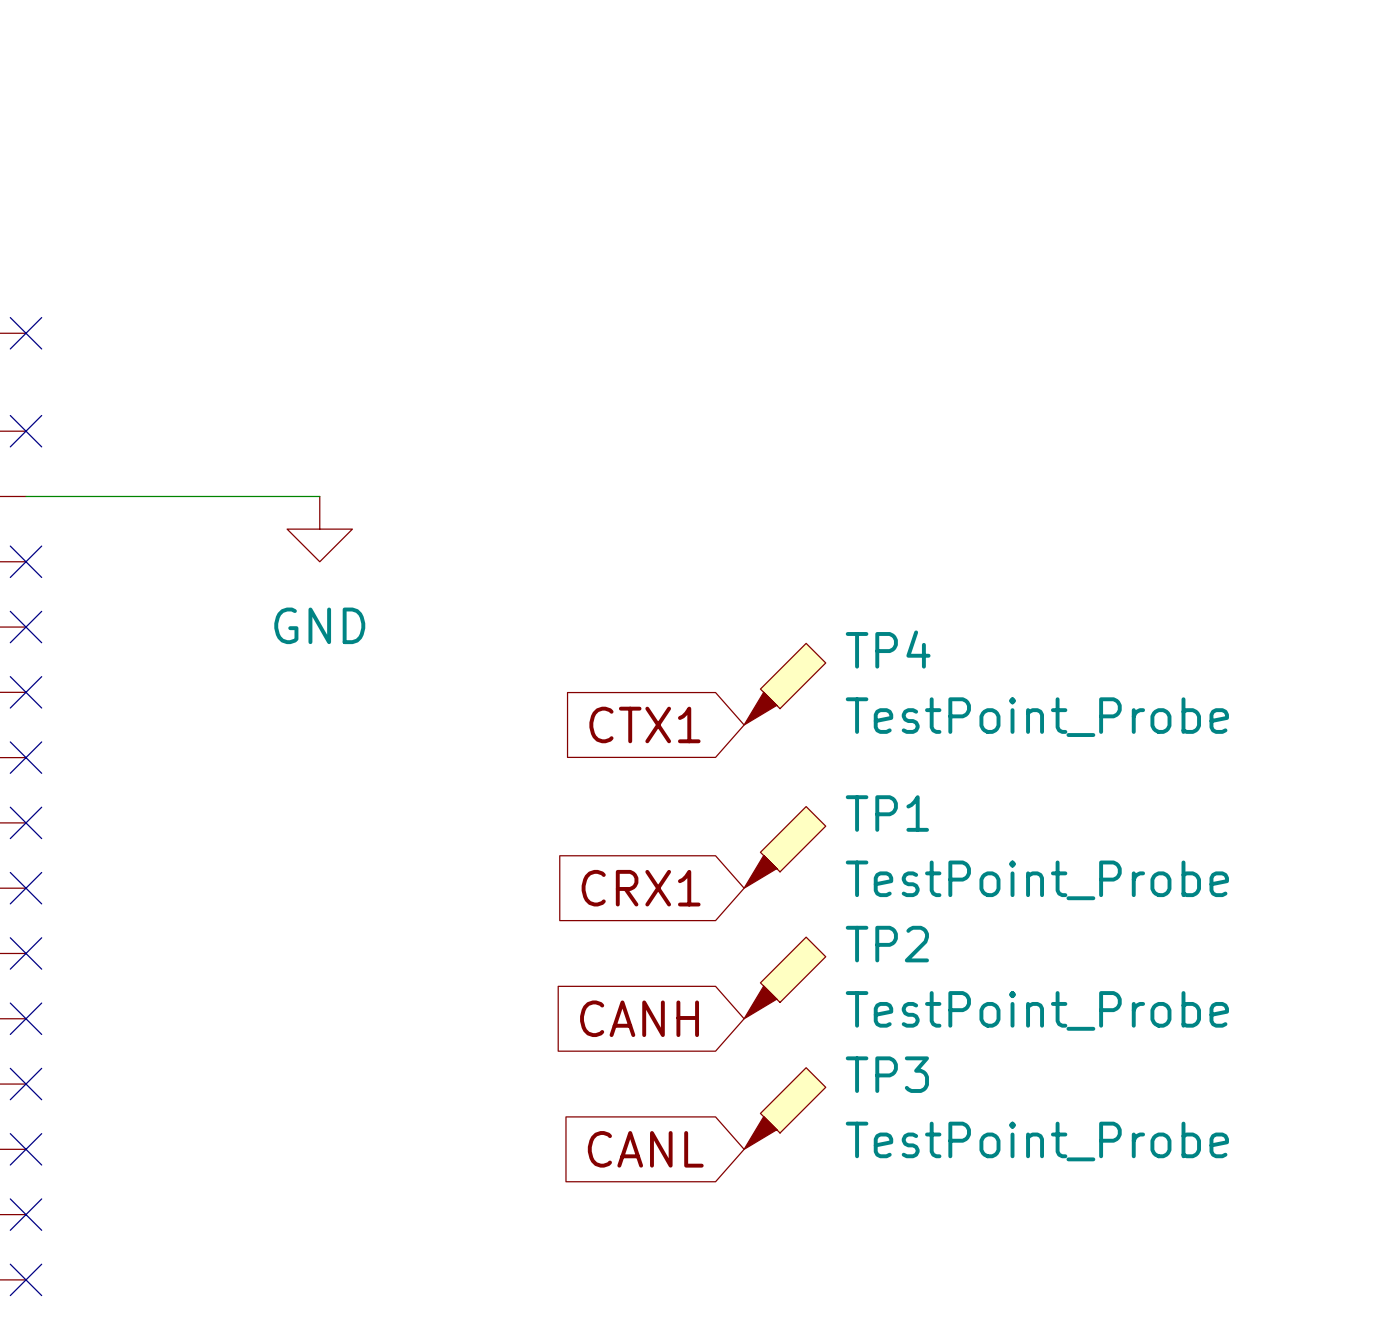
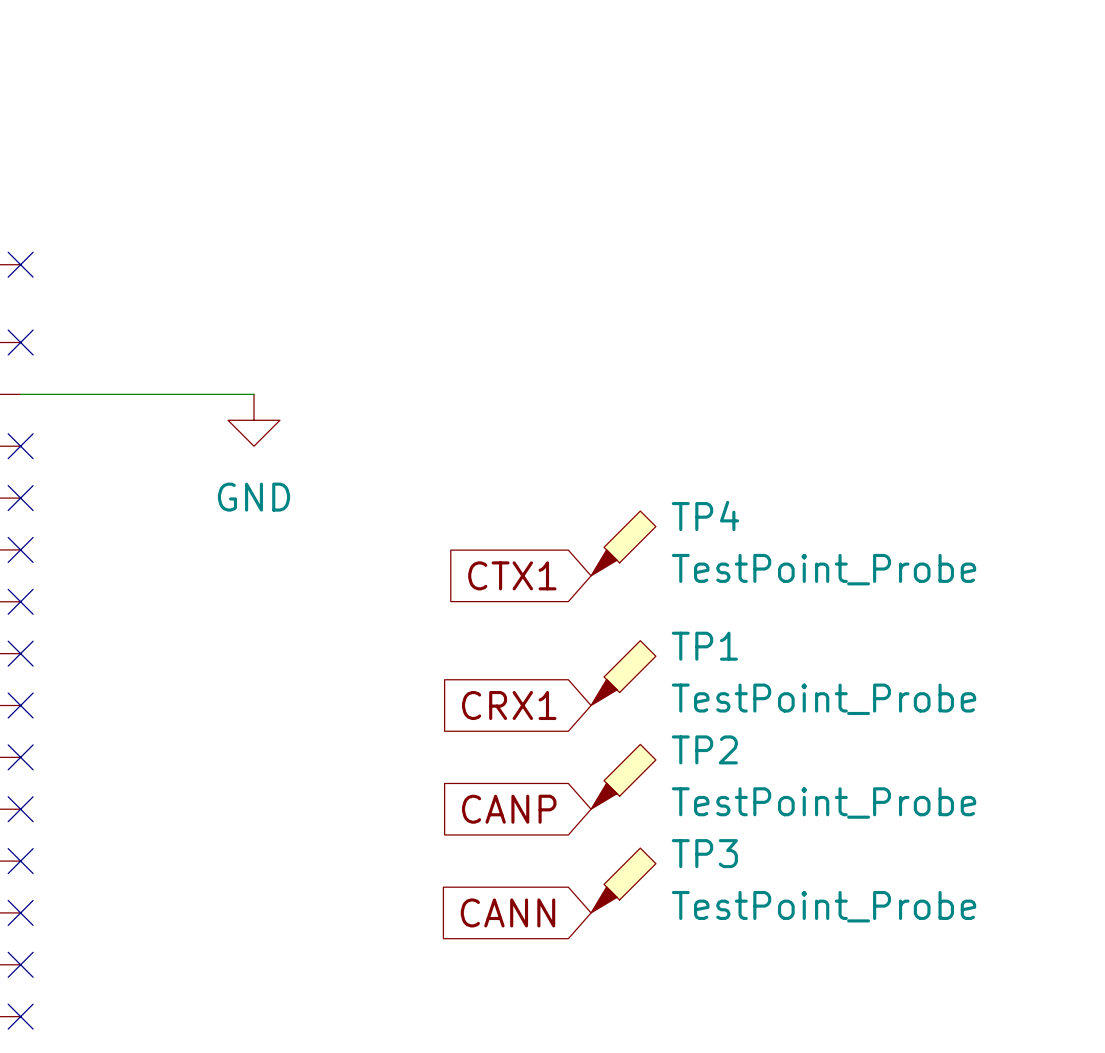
global label: CANH (639, 1018) -> CANP (509, 809)
global label: CANL (645, 1149) -> CANN (507, 912)

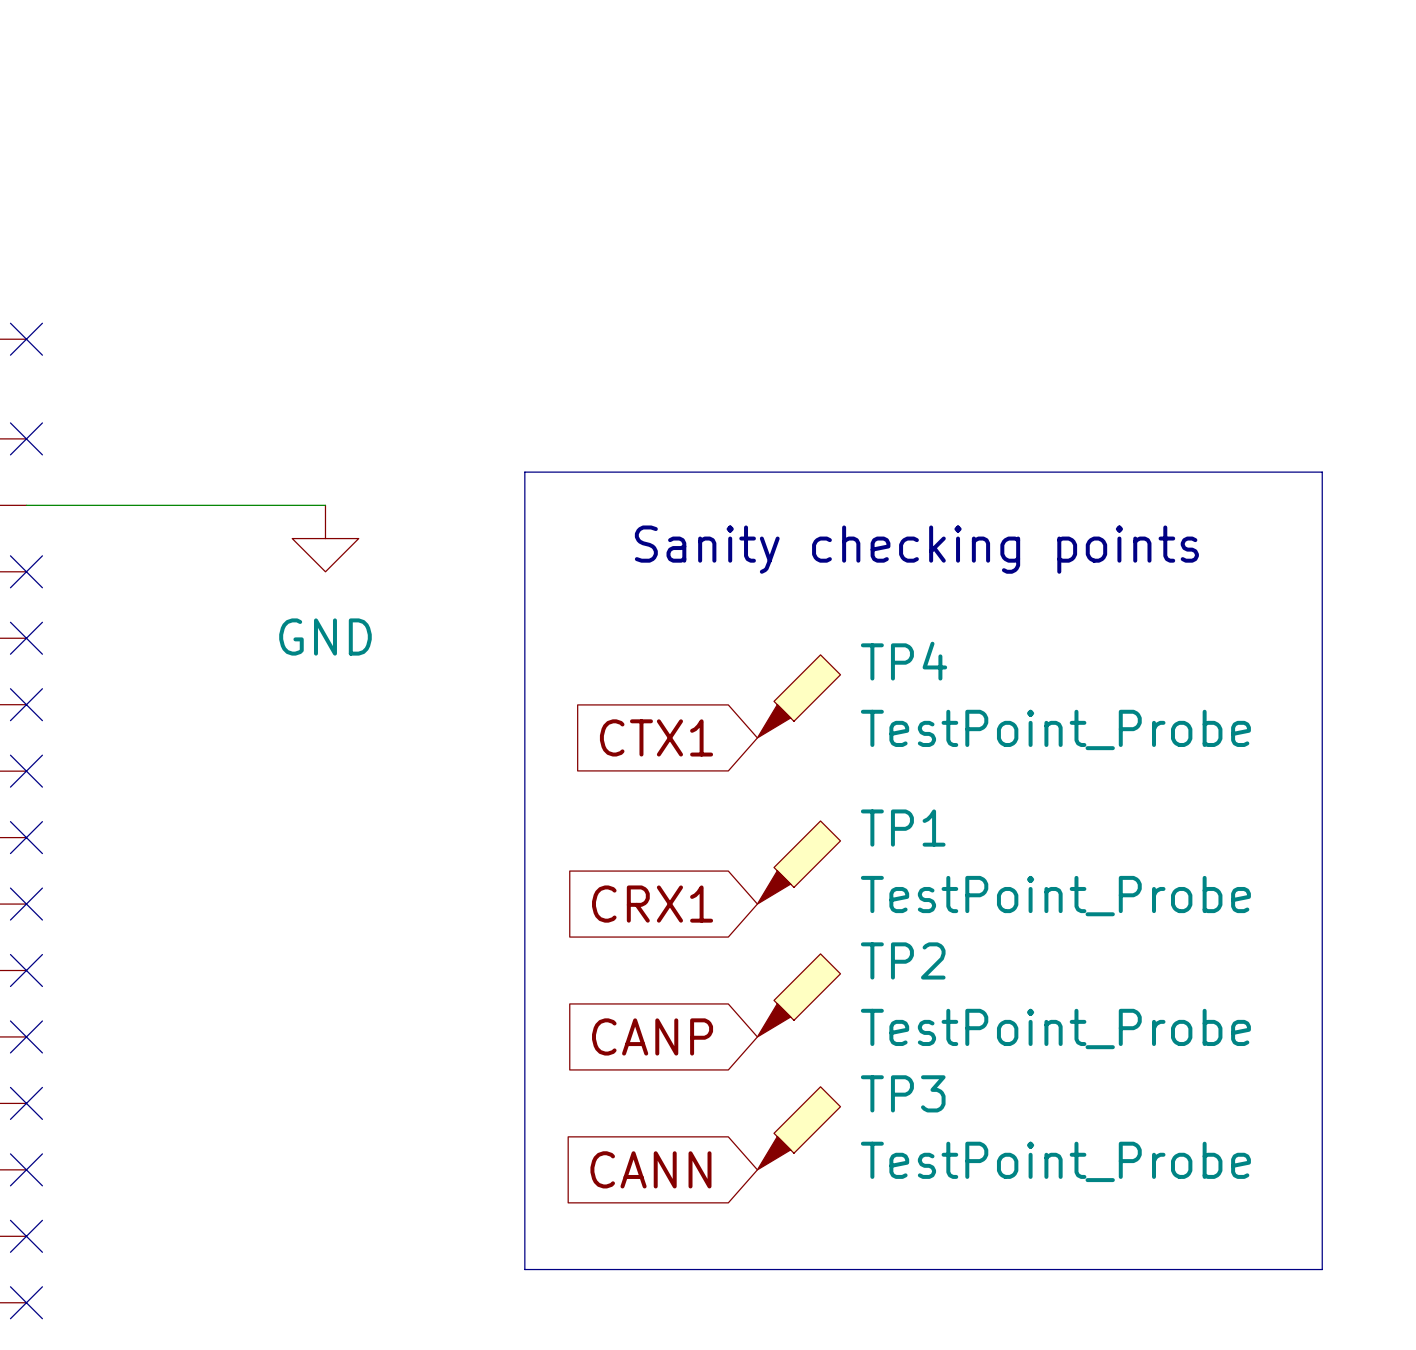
line: none -> (524, 472) (1322, 472) (1322, 1269) (524, 1269) (524, 472)
text: none -> Sanity checking points (916, 549)

